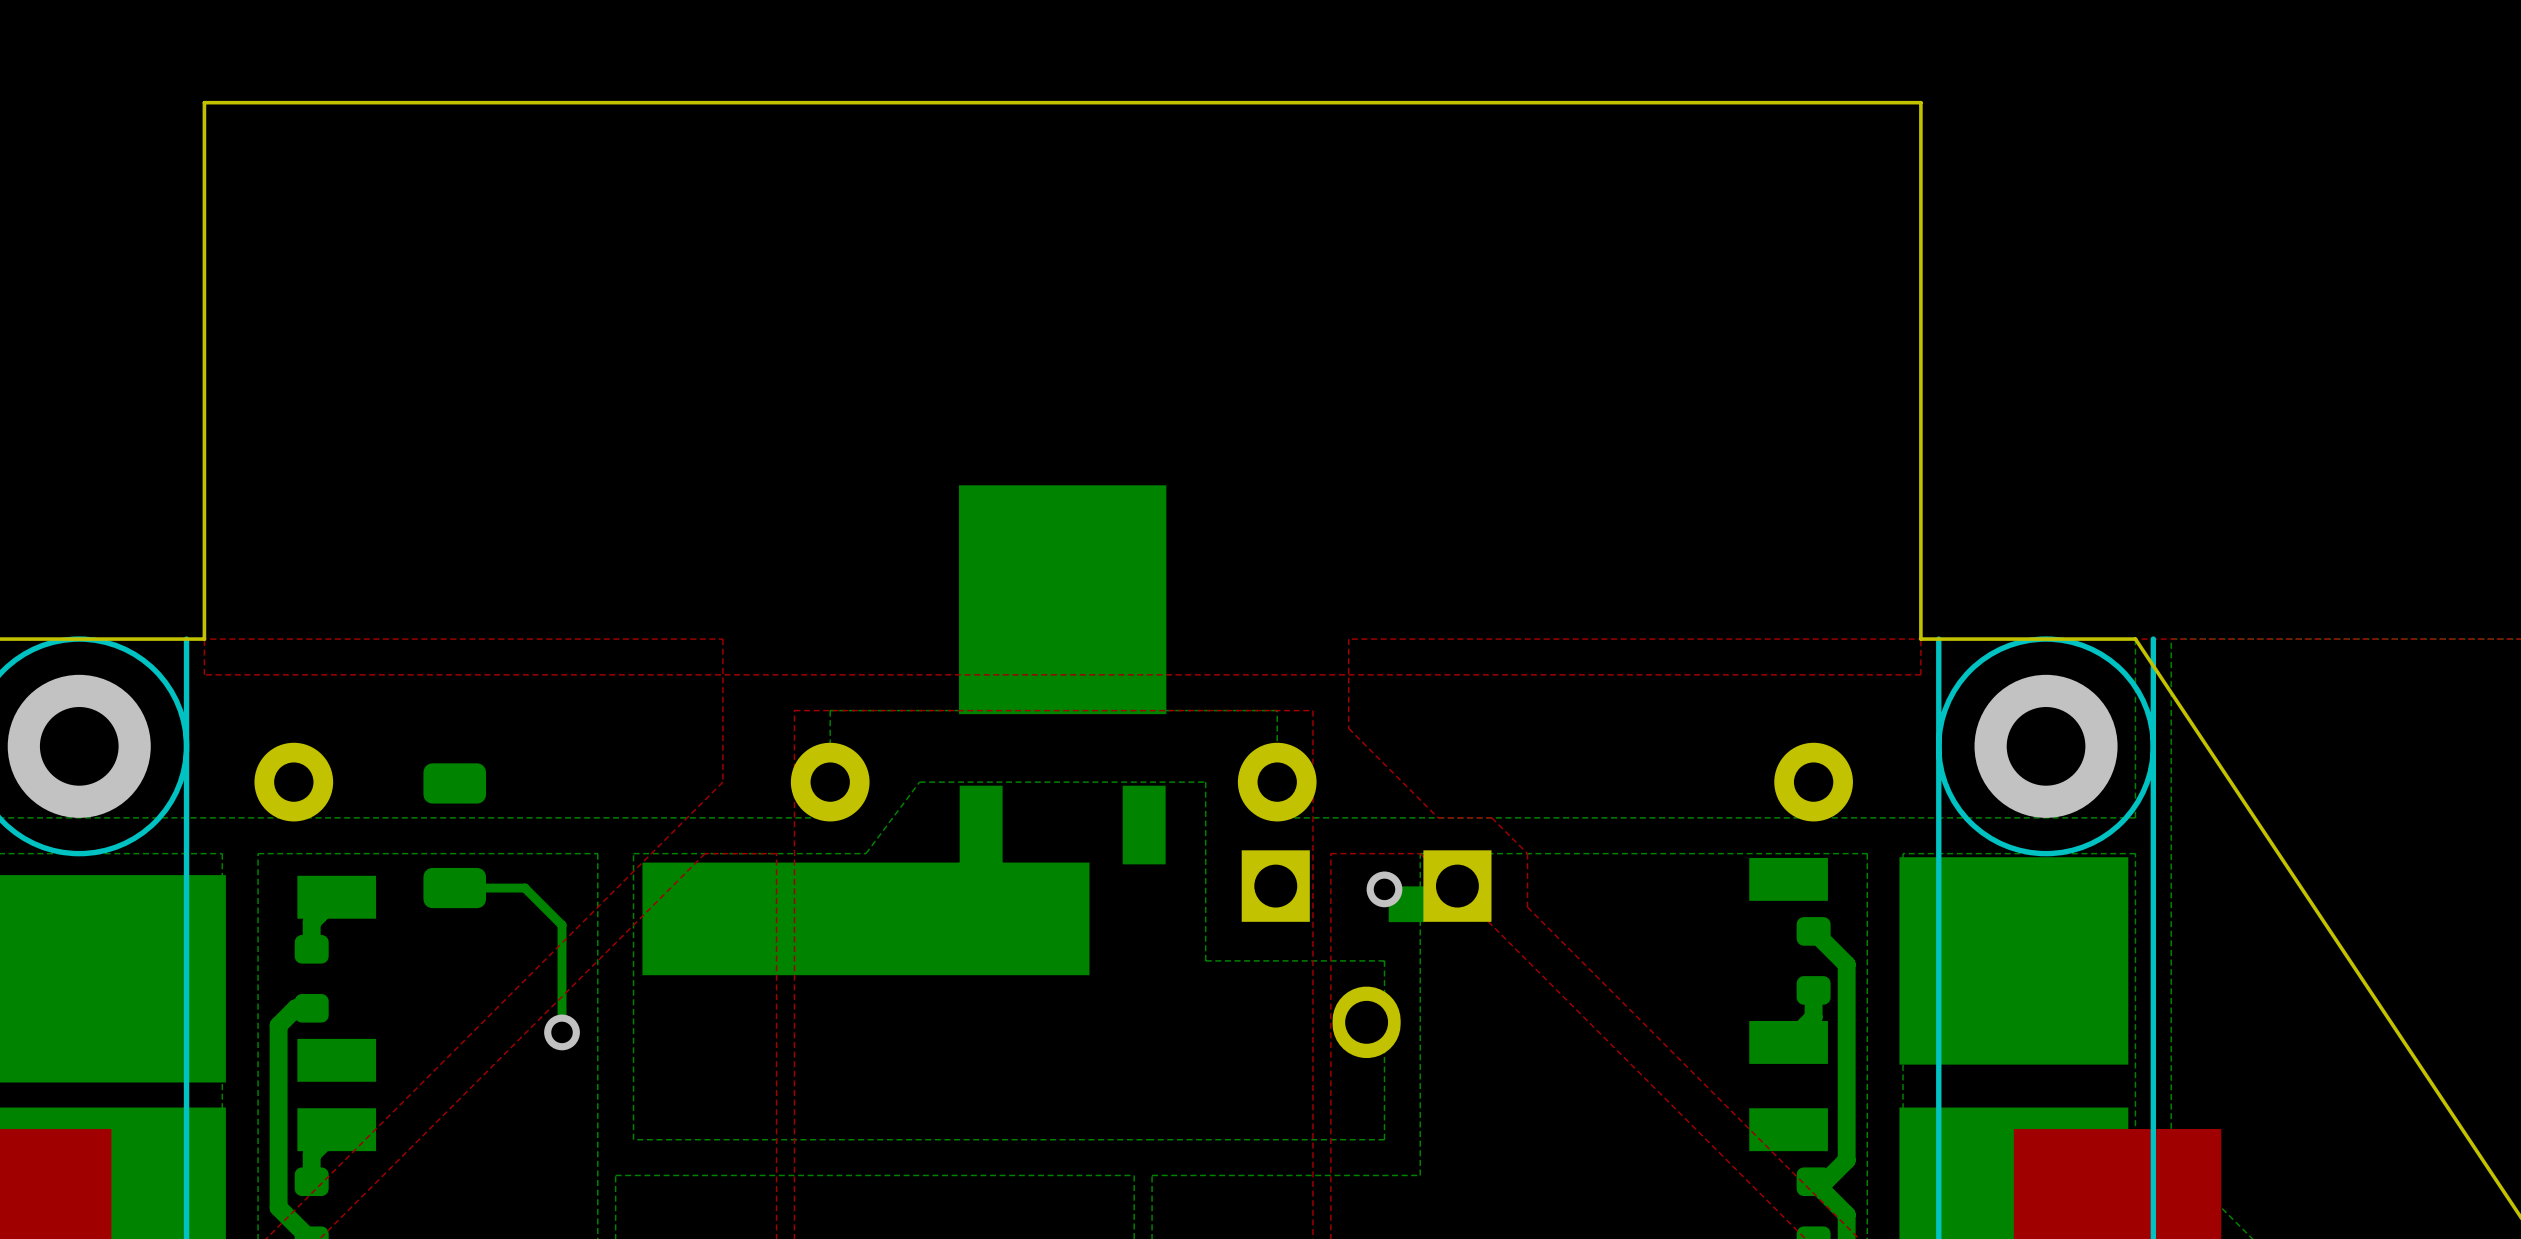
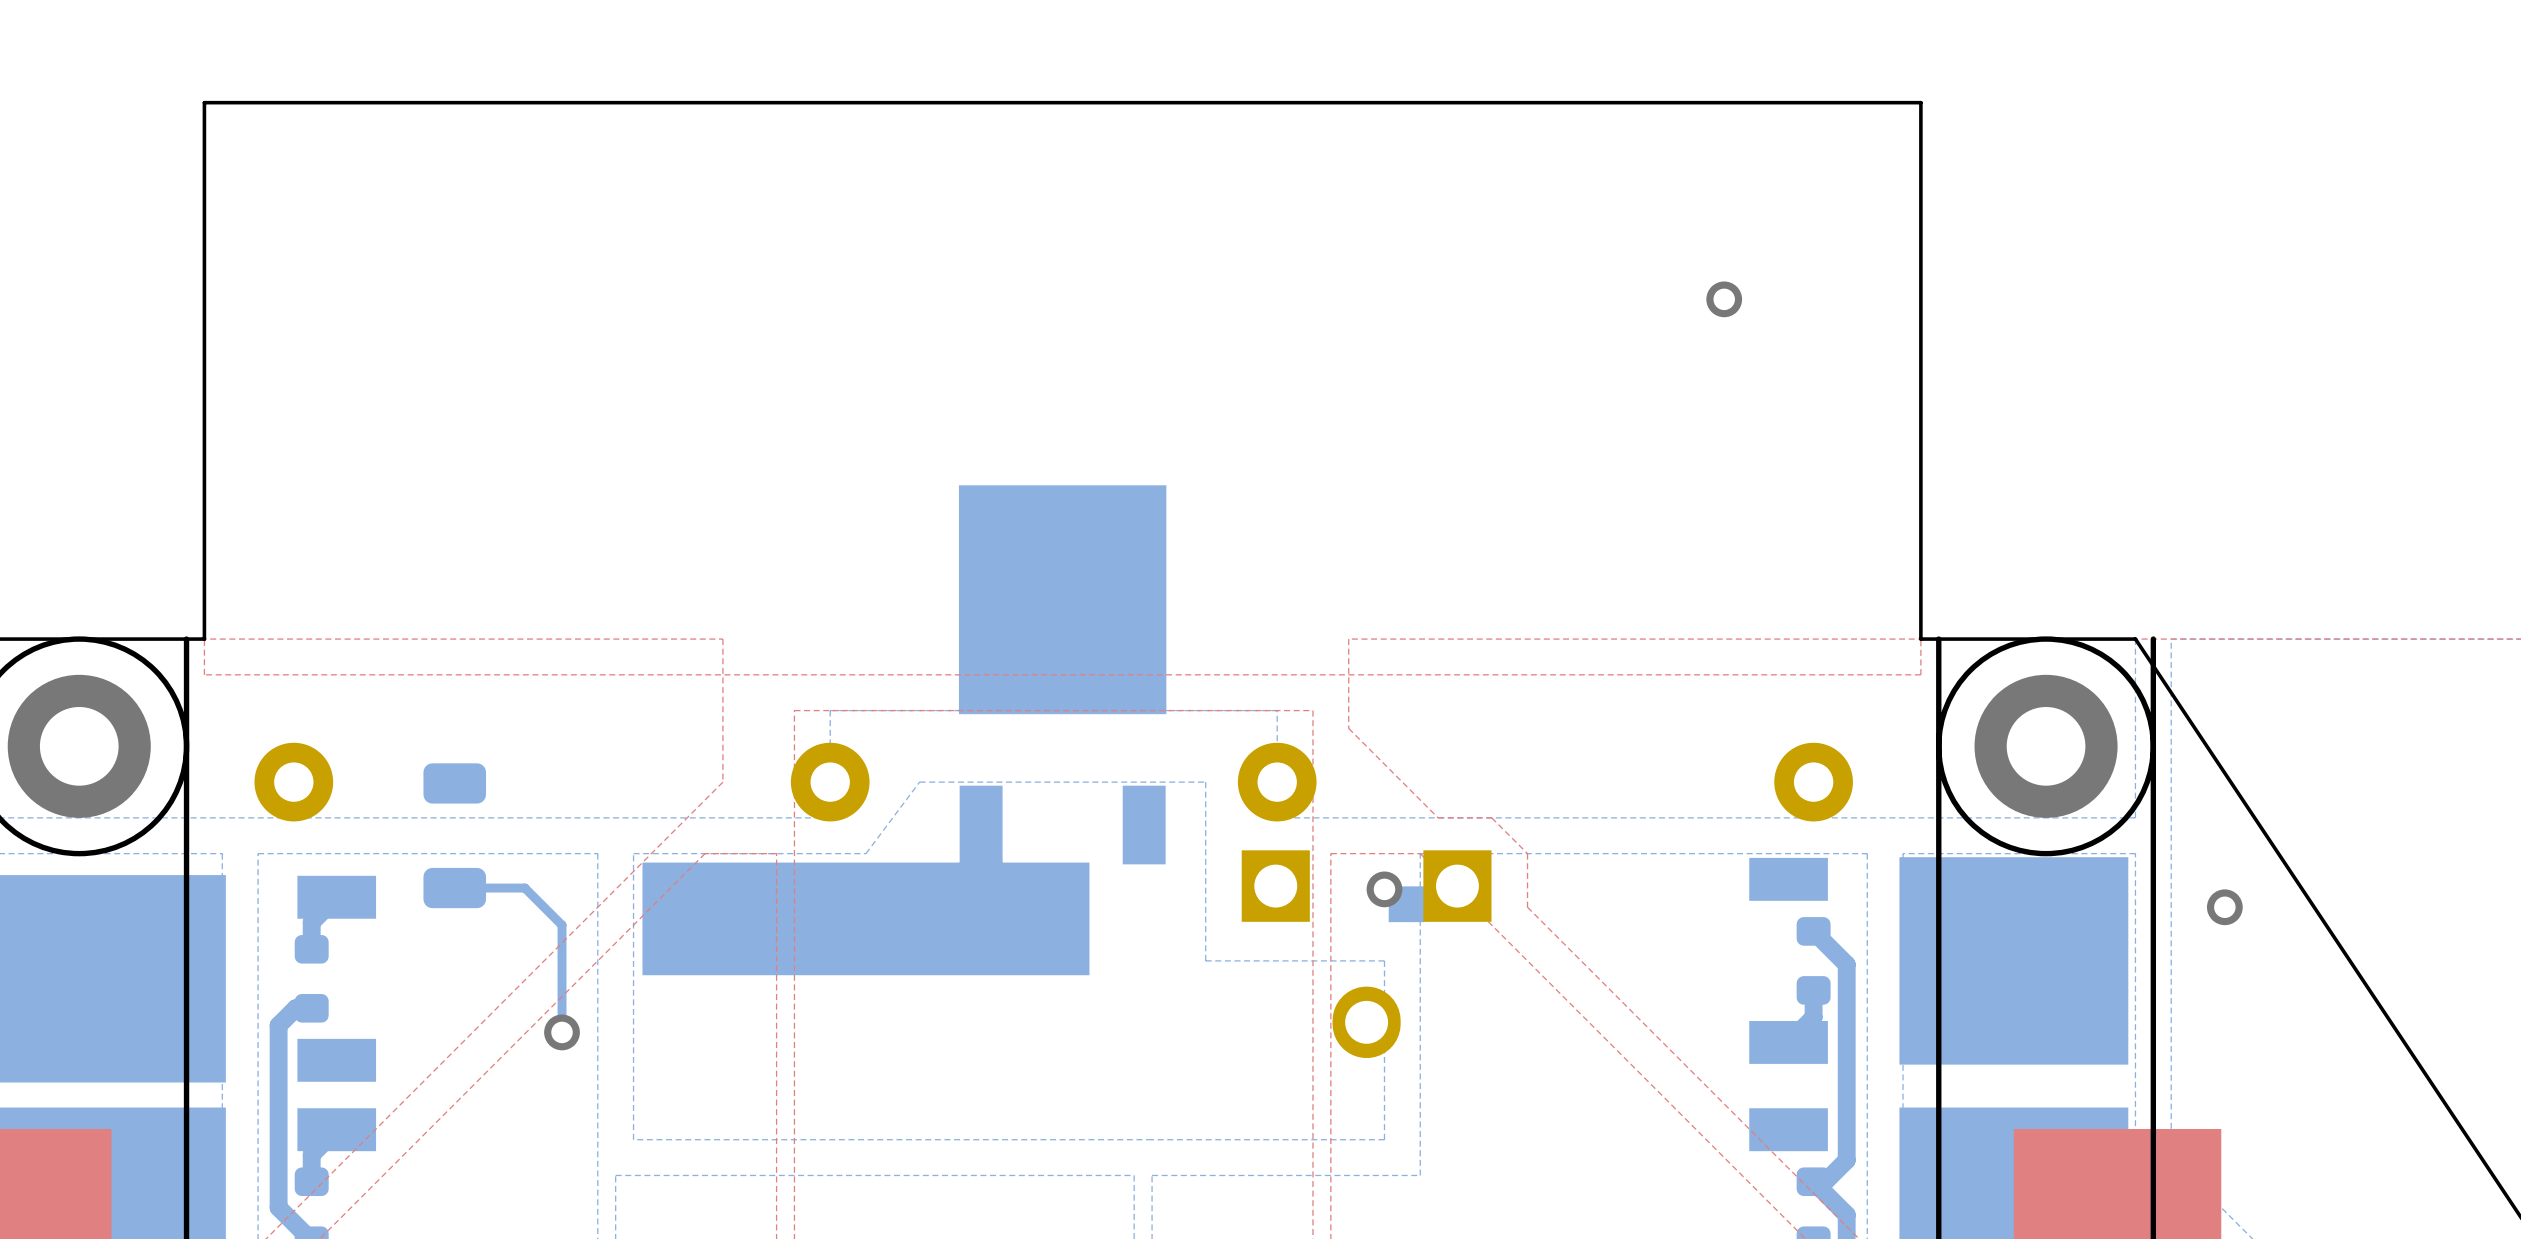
via: none -> (1724, 299)
via: none -> (2224, 907)

